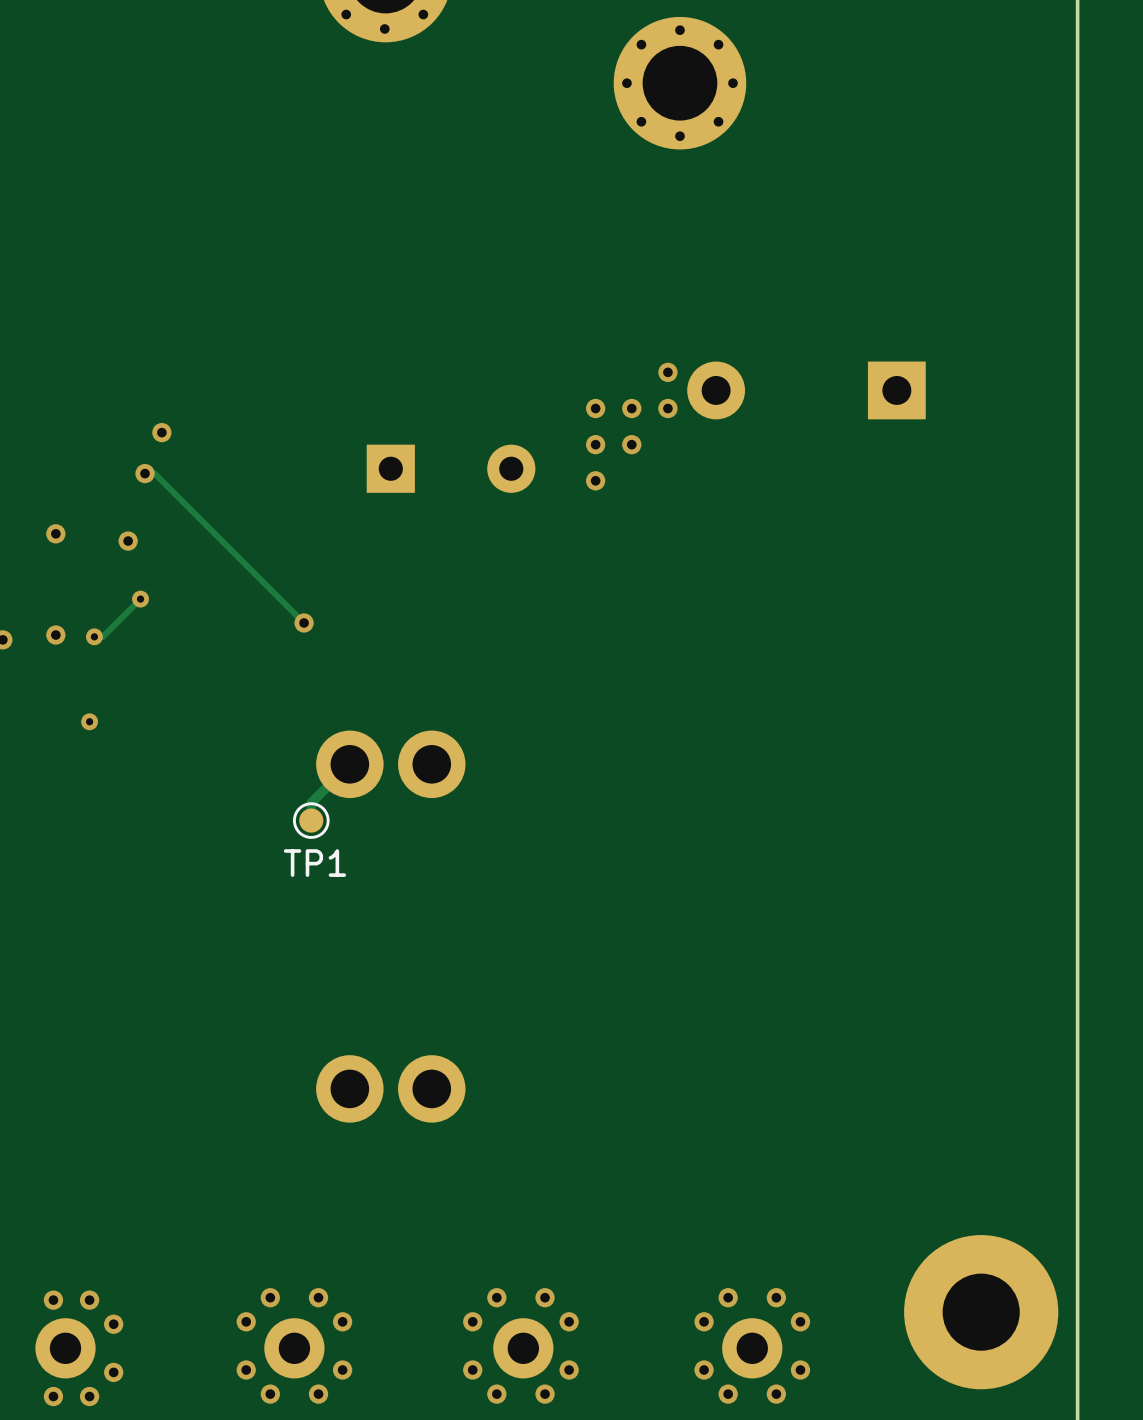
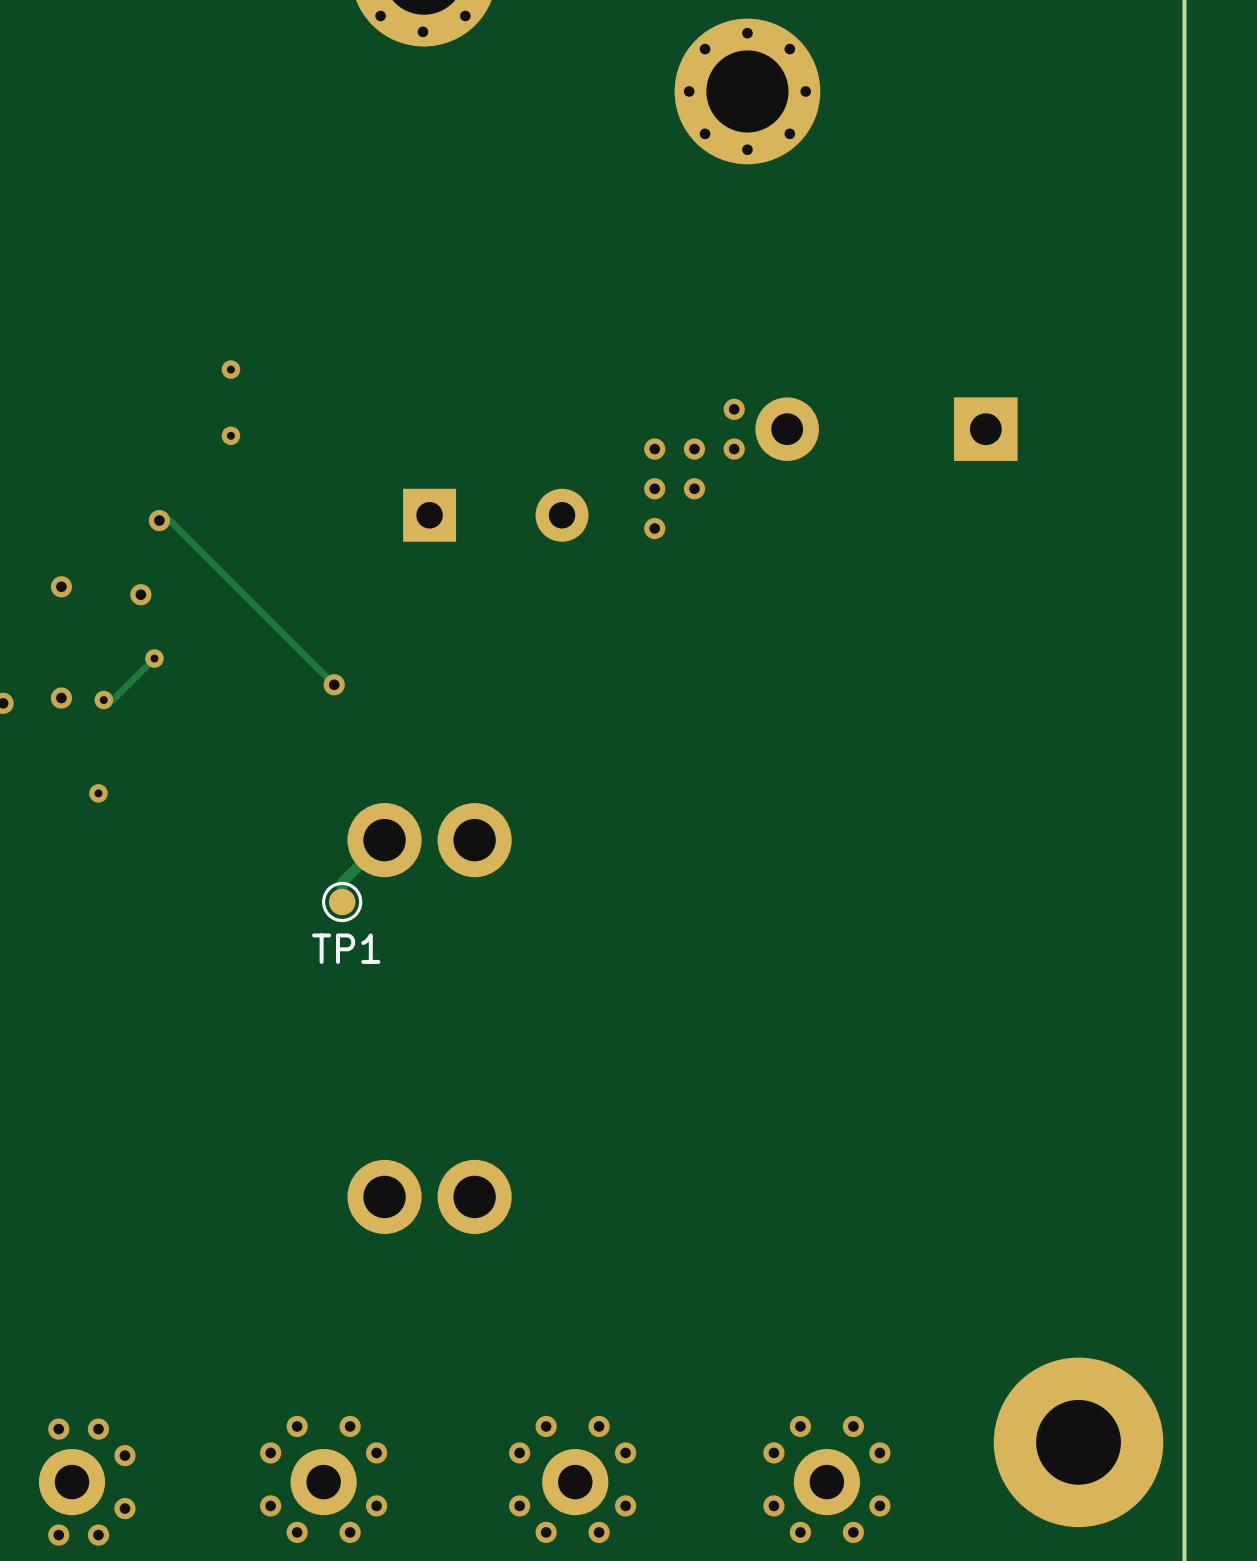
via: none -> (230, 369)
via: none -> (230, 435)
via: (161, 432) -> none

